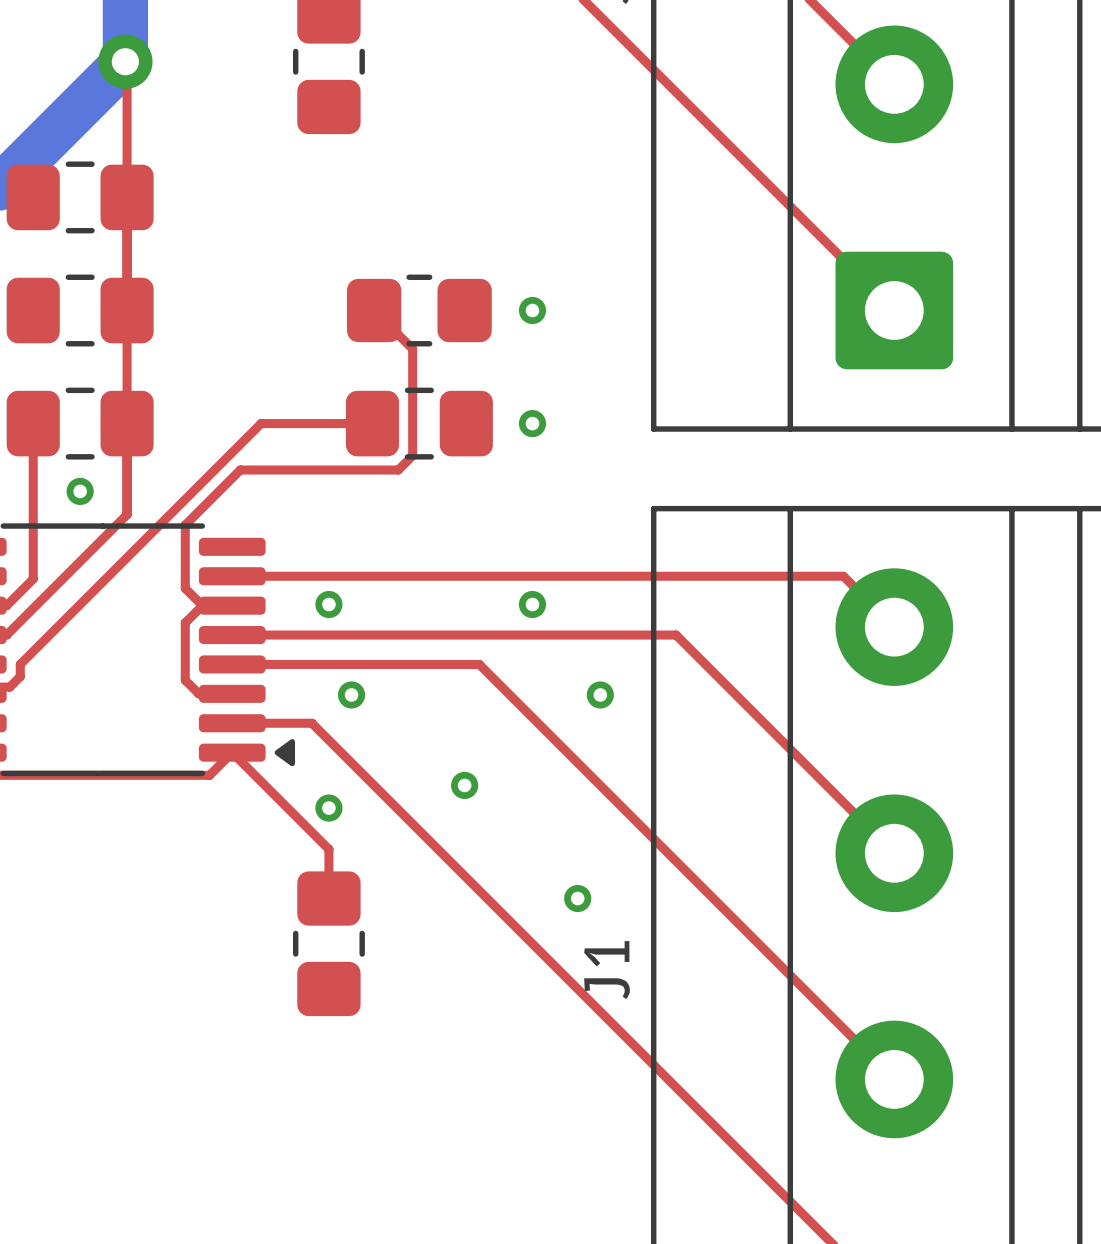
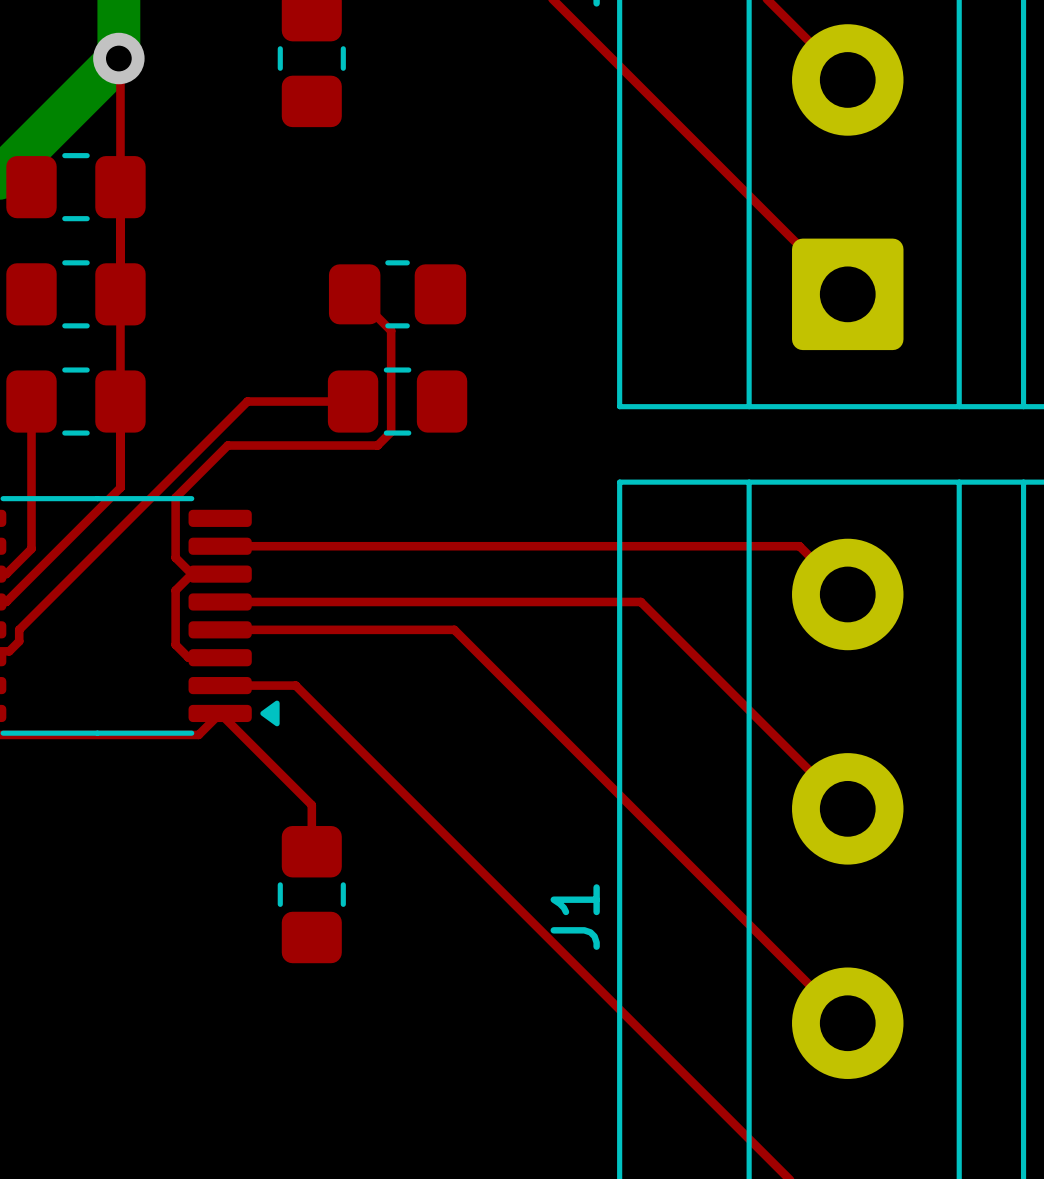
via: (532, 310) -> none
via: (532, 423) -> none
via: (80, 491) -> none
via: (328, 604) -> none
via: (532, 604) -> none
via: (351, 694) -> none
via: (600, 694) -> none
via: (464, 785) -> none
via: (328, 808) -> none
via: (577, 898) -> none

